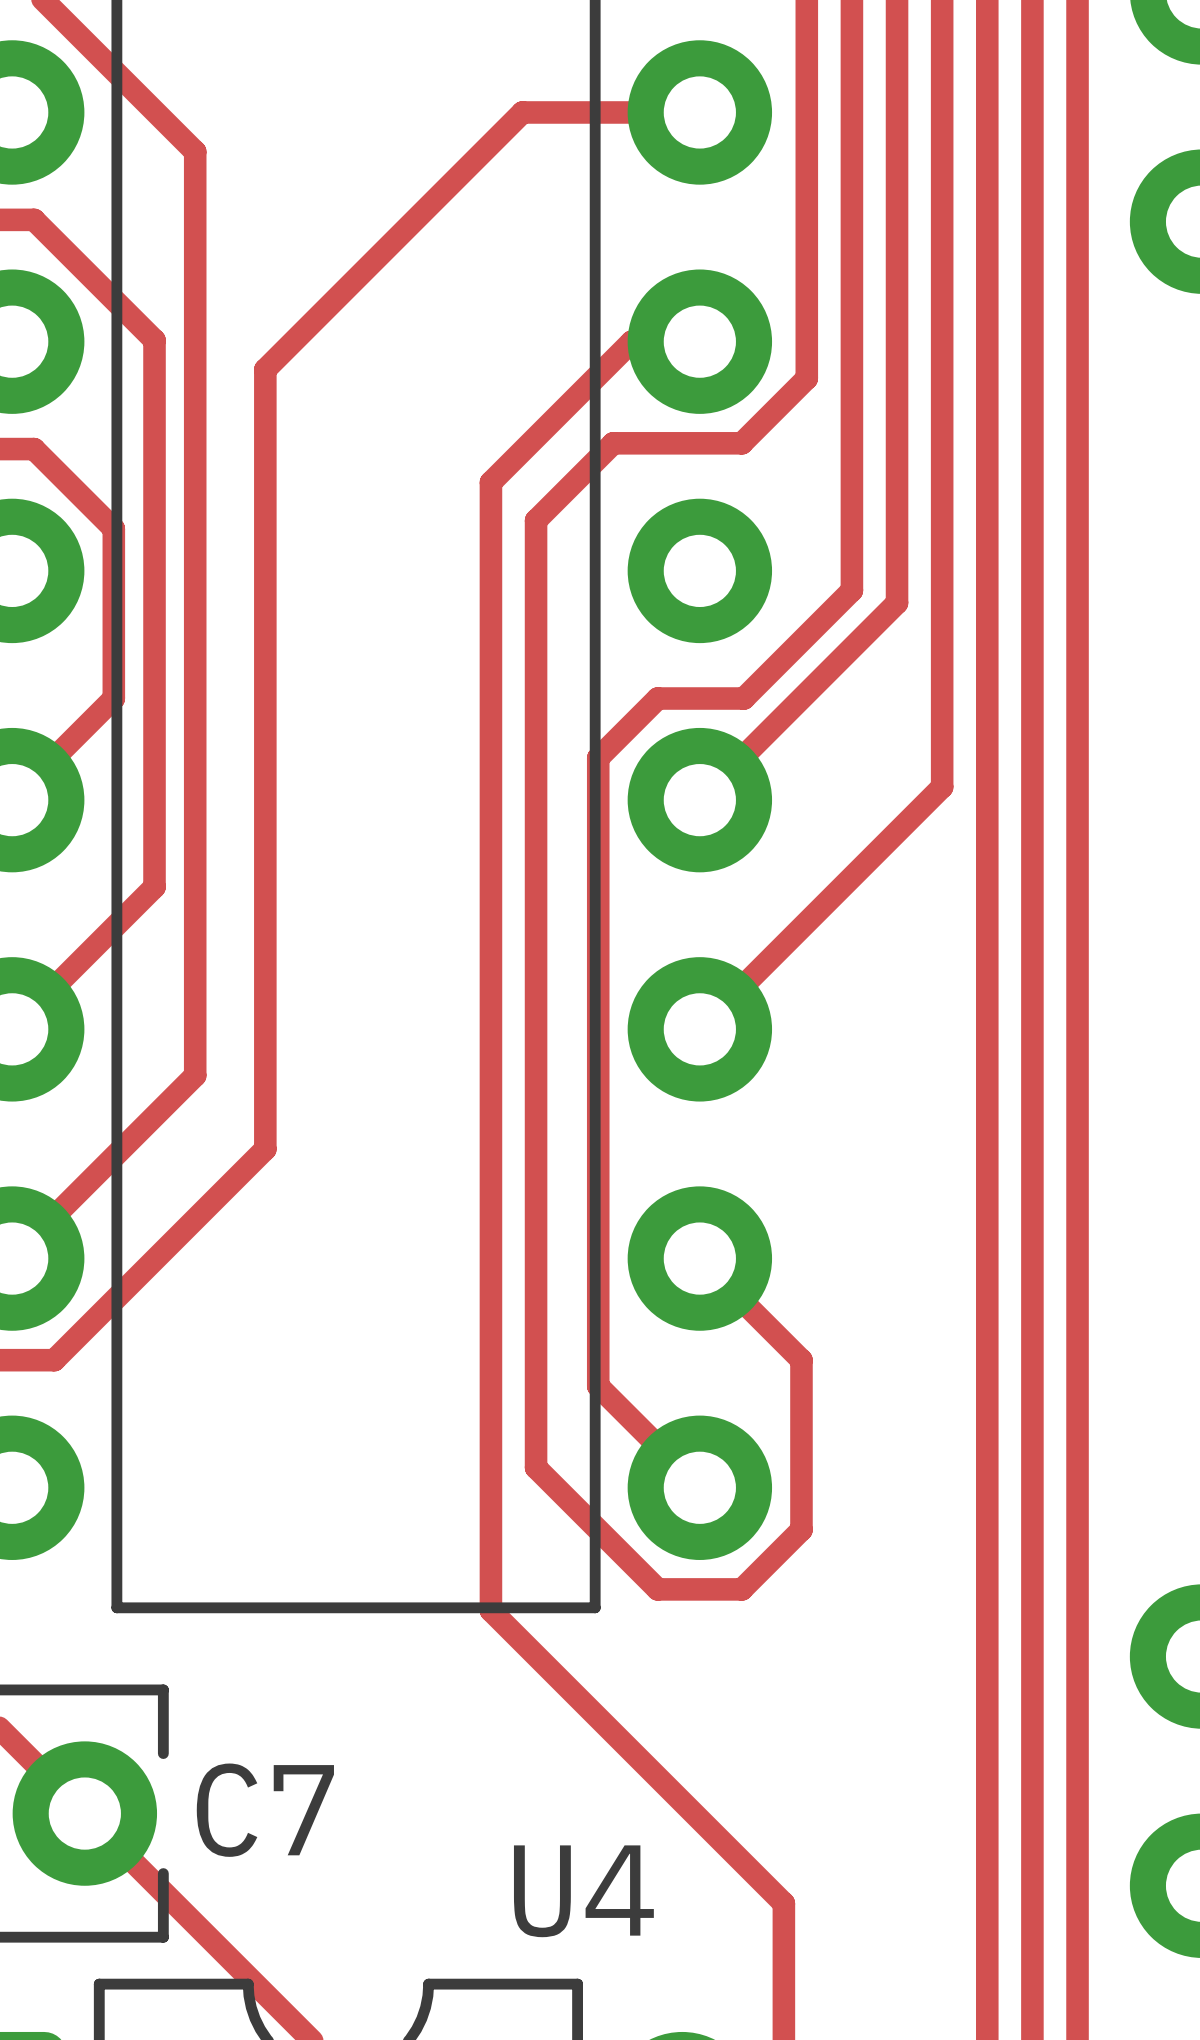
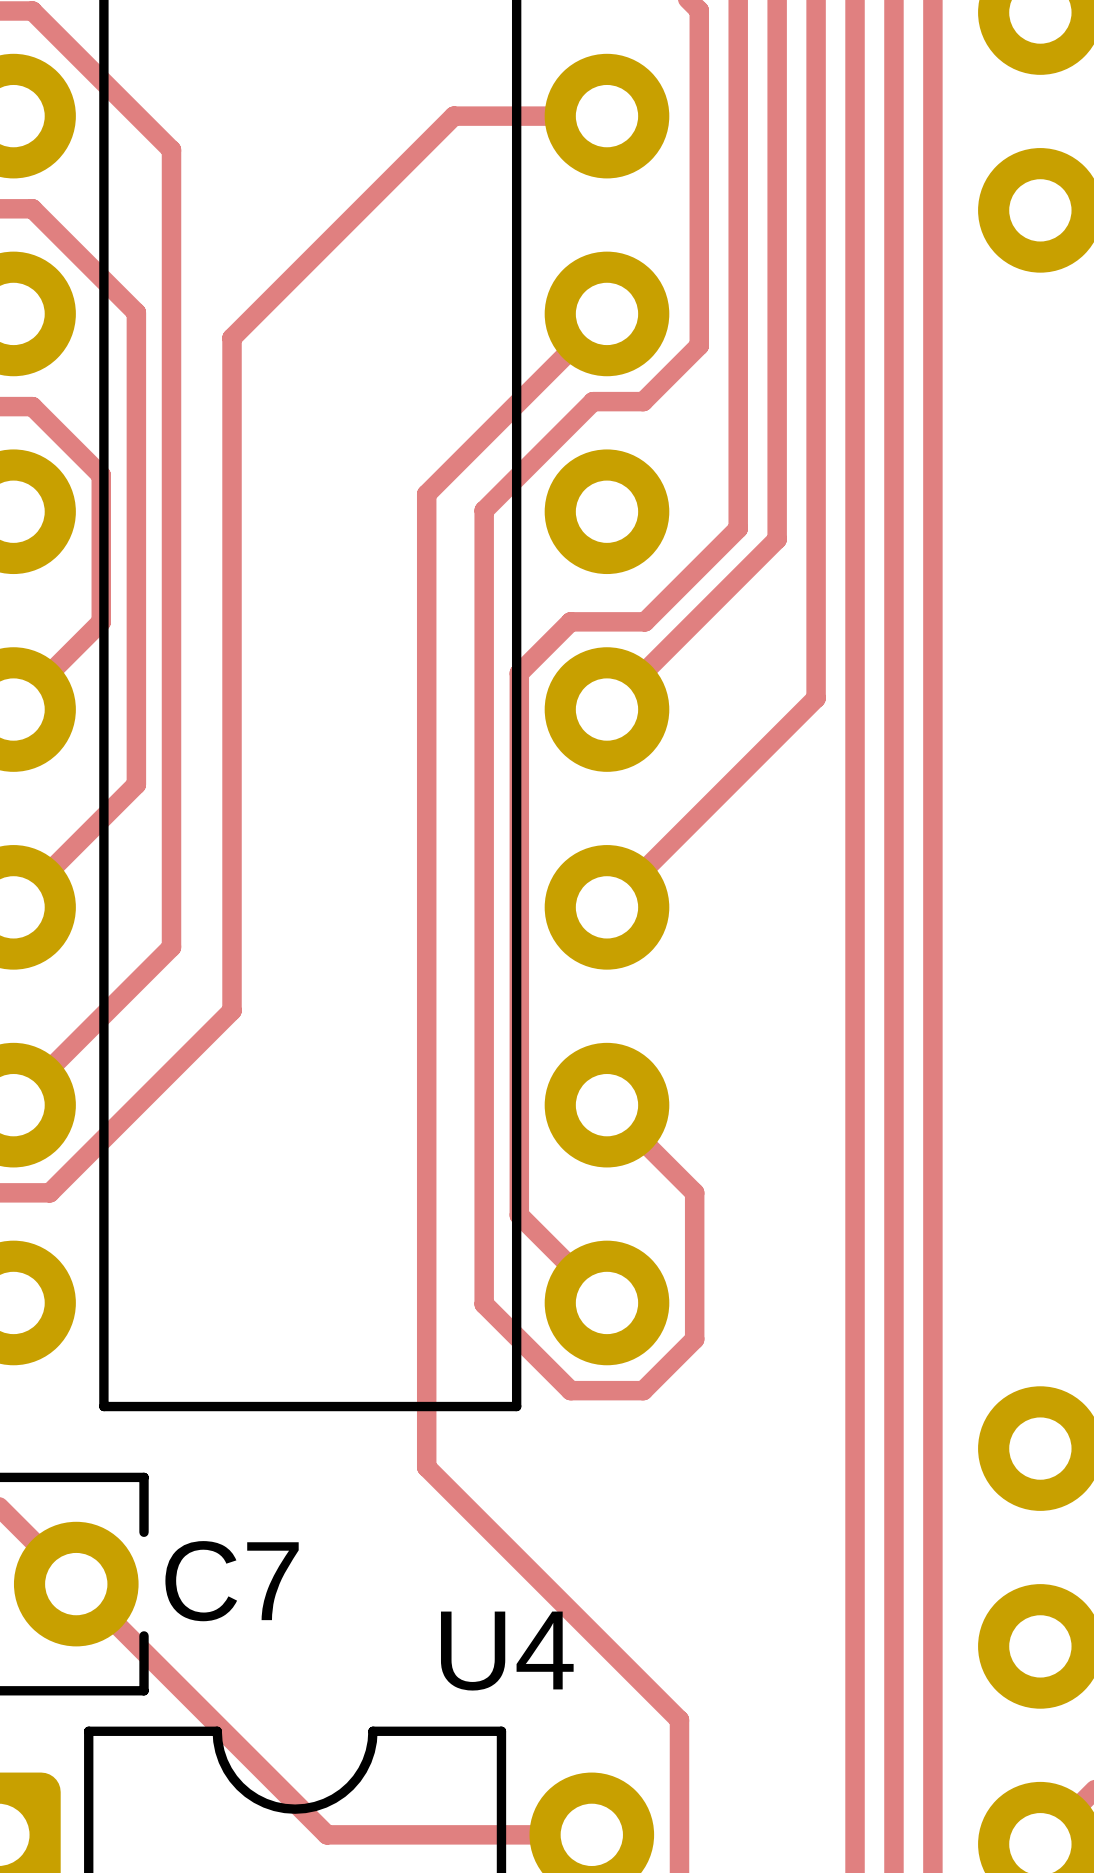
track: (699, 341) (631, 341) (490, 482) (490, 550) -> (606, 313) (426, 494)
track: (683, 443) (613, 443) (536, 520) (536, 1467) (557, 1489) -> (593, 401) (484, 510) (484, 1304)
track: (490, 1610) (783, 1903) (783, 1971) -> (426, 1408) (426, 1467) (679, 1720)

